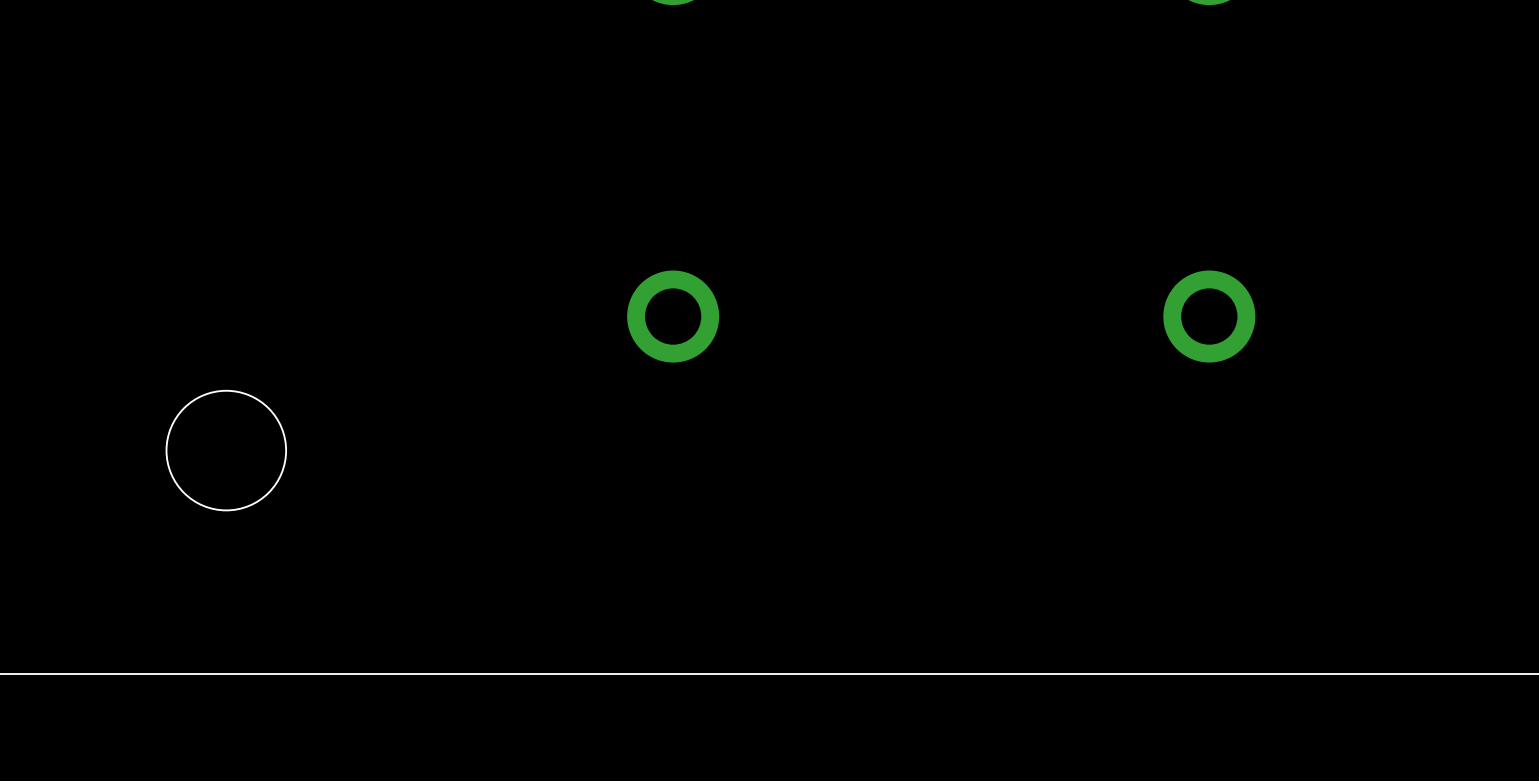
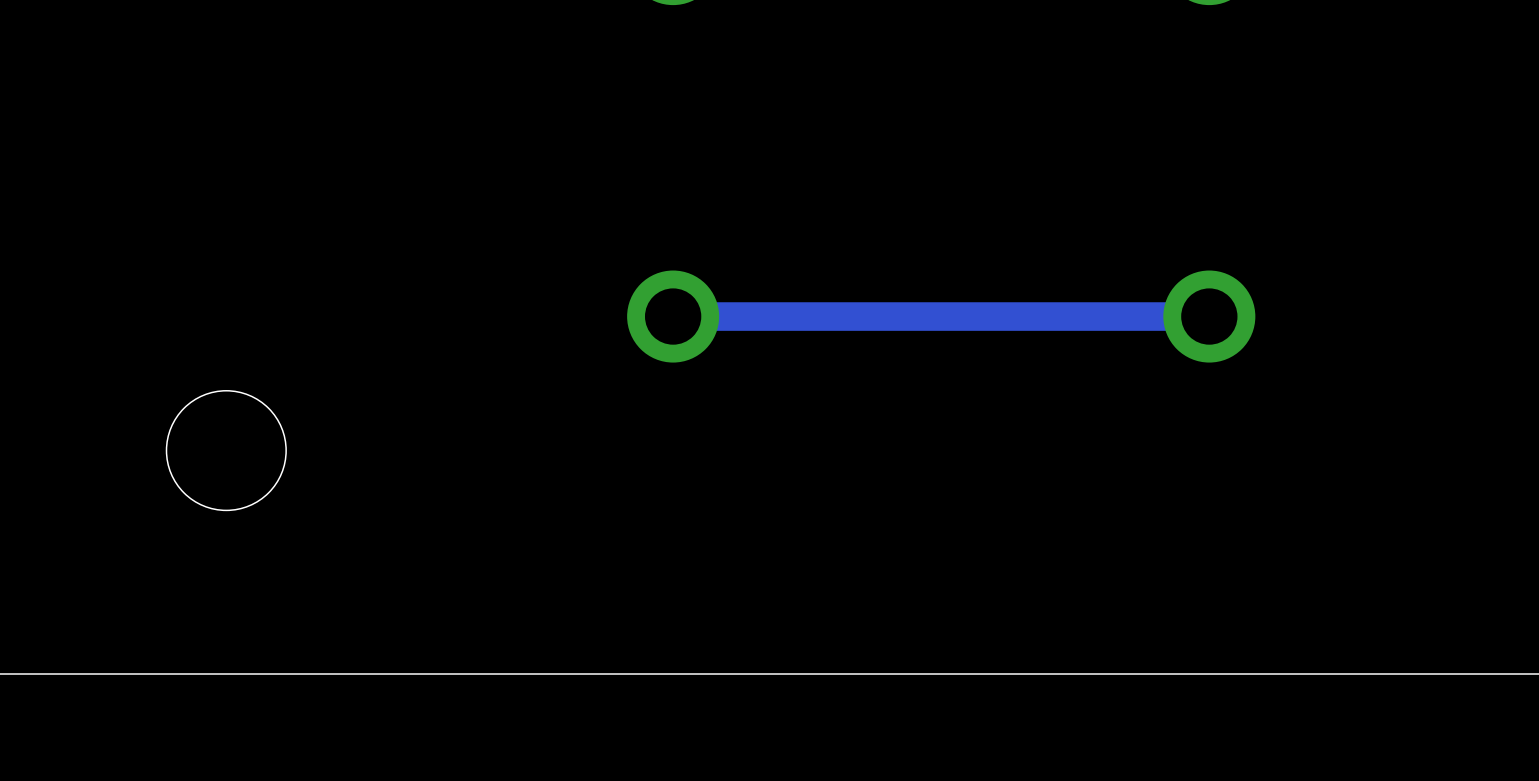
track: none -> (1209, 316) (673, 316)

